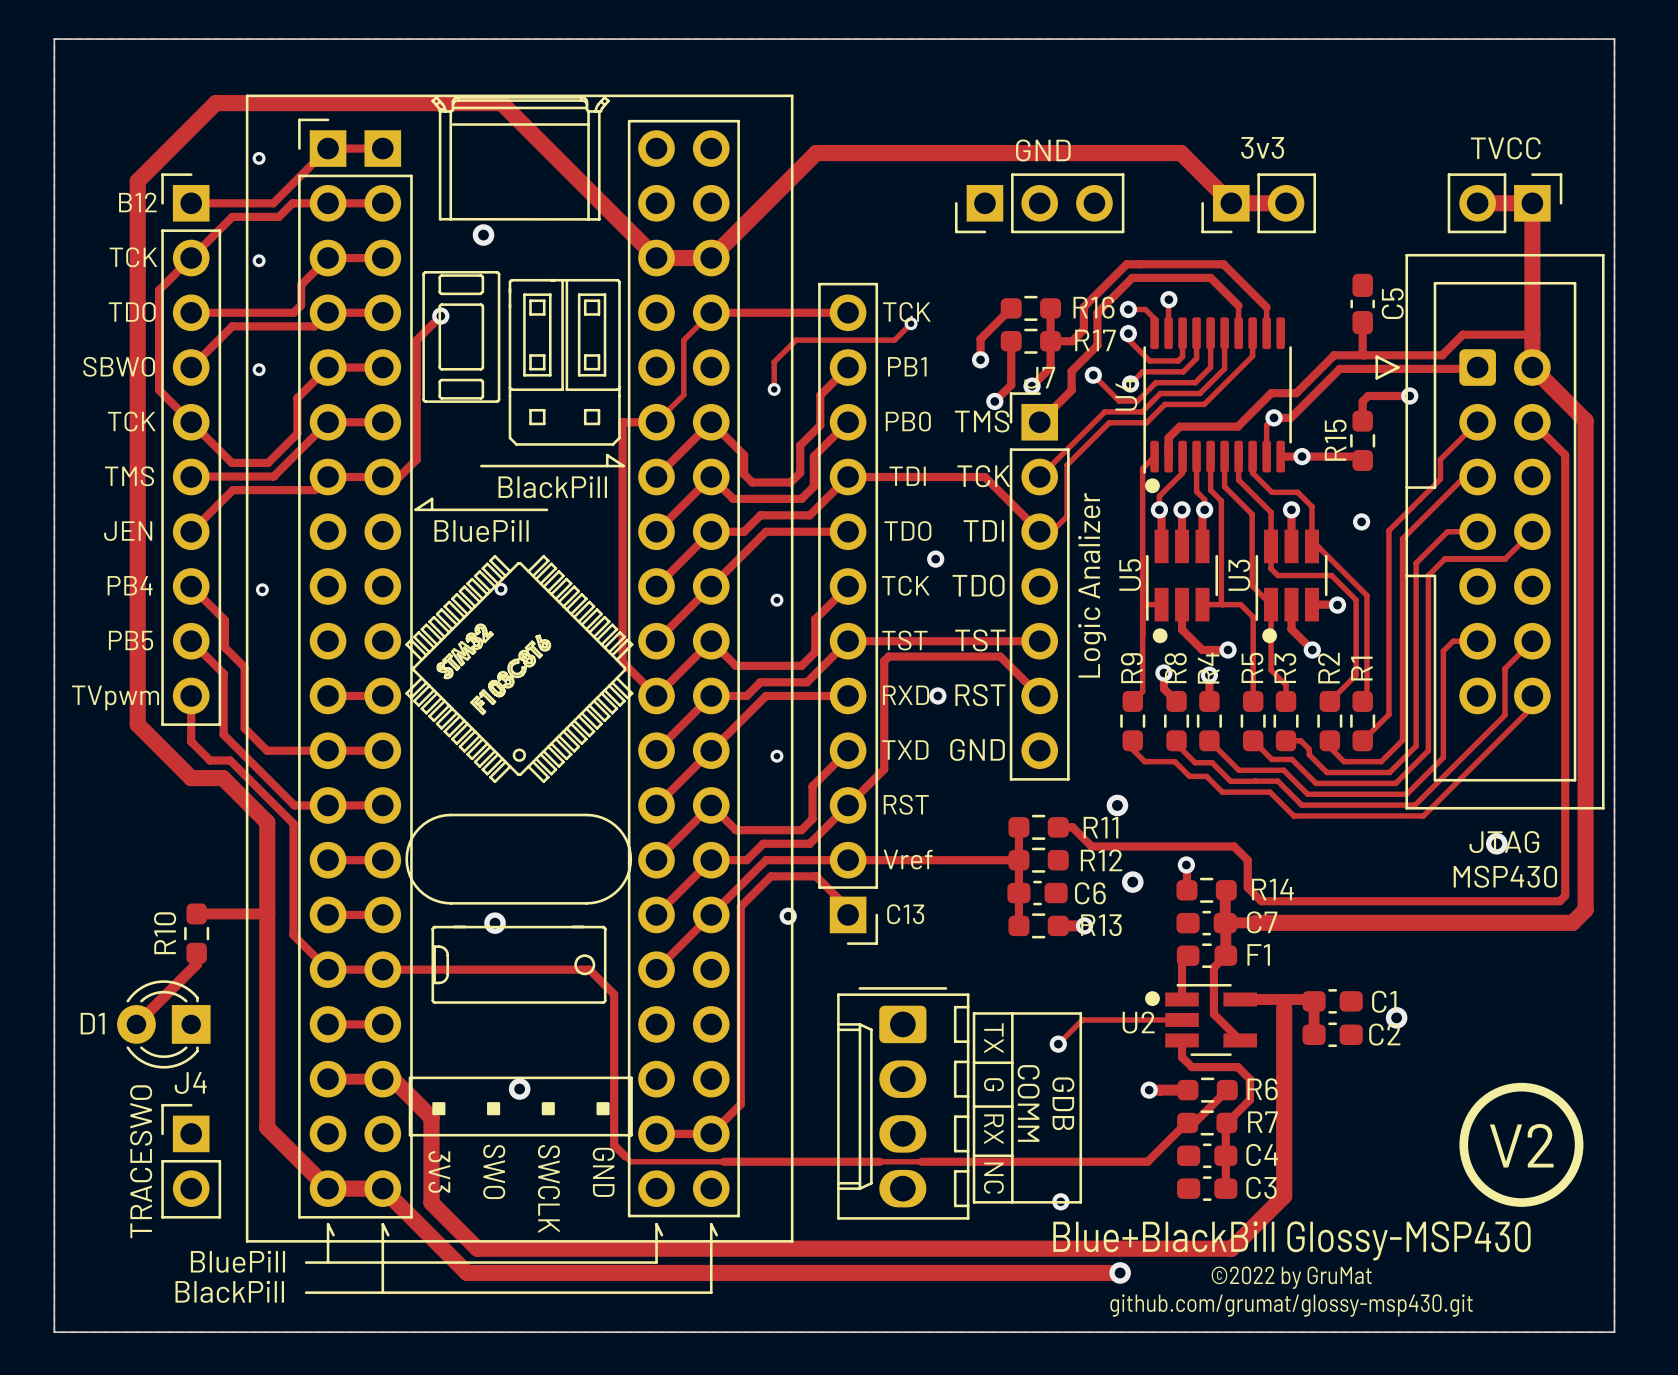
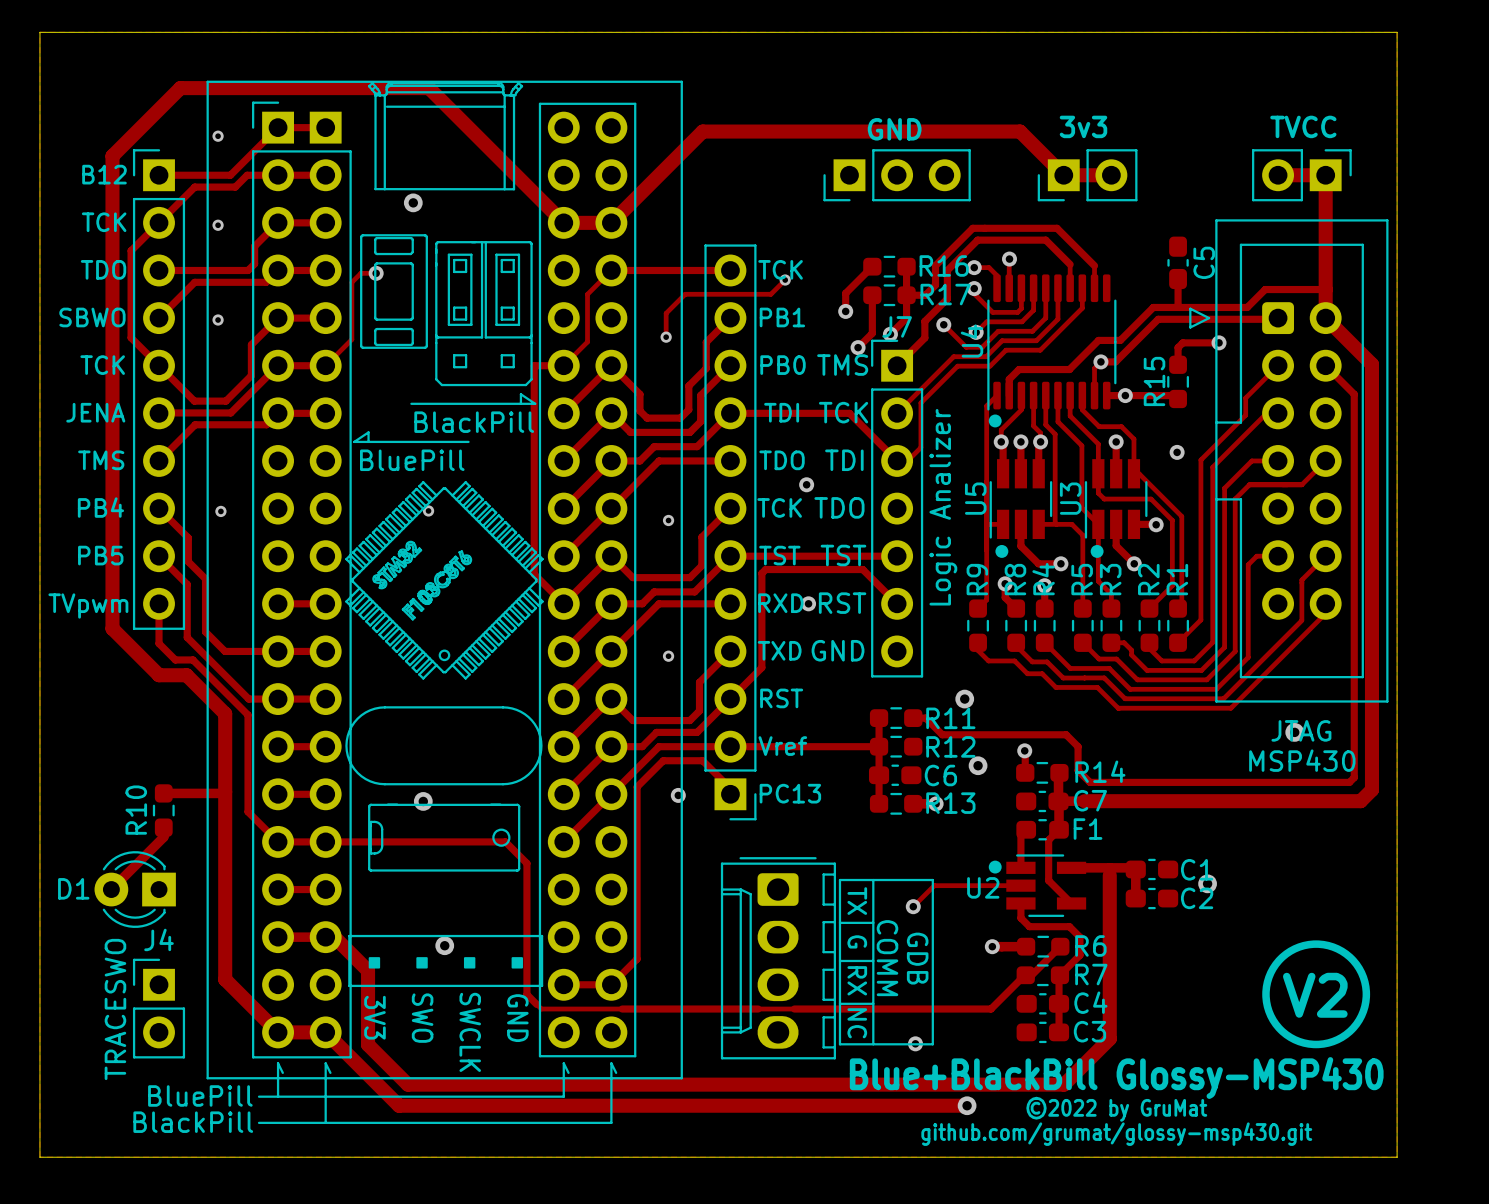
text: none -> TVCC (1303, 126)
part value: TVCC (1505, 148) -> none
track: (440, 316) (416, 340) (416, 459) (399, 477) (382, 477) -> (376, 273) (360, 273) (351, 282) (351, 339) (325, 365)
text: TMS (129, 476) -> JENA (95, 412)
text: JEN (128, 531) -> TMS (101, 460)
text: C13 (905, 914) -> PC13 (790, 793)

